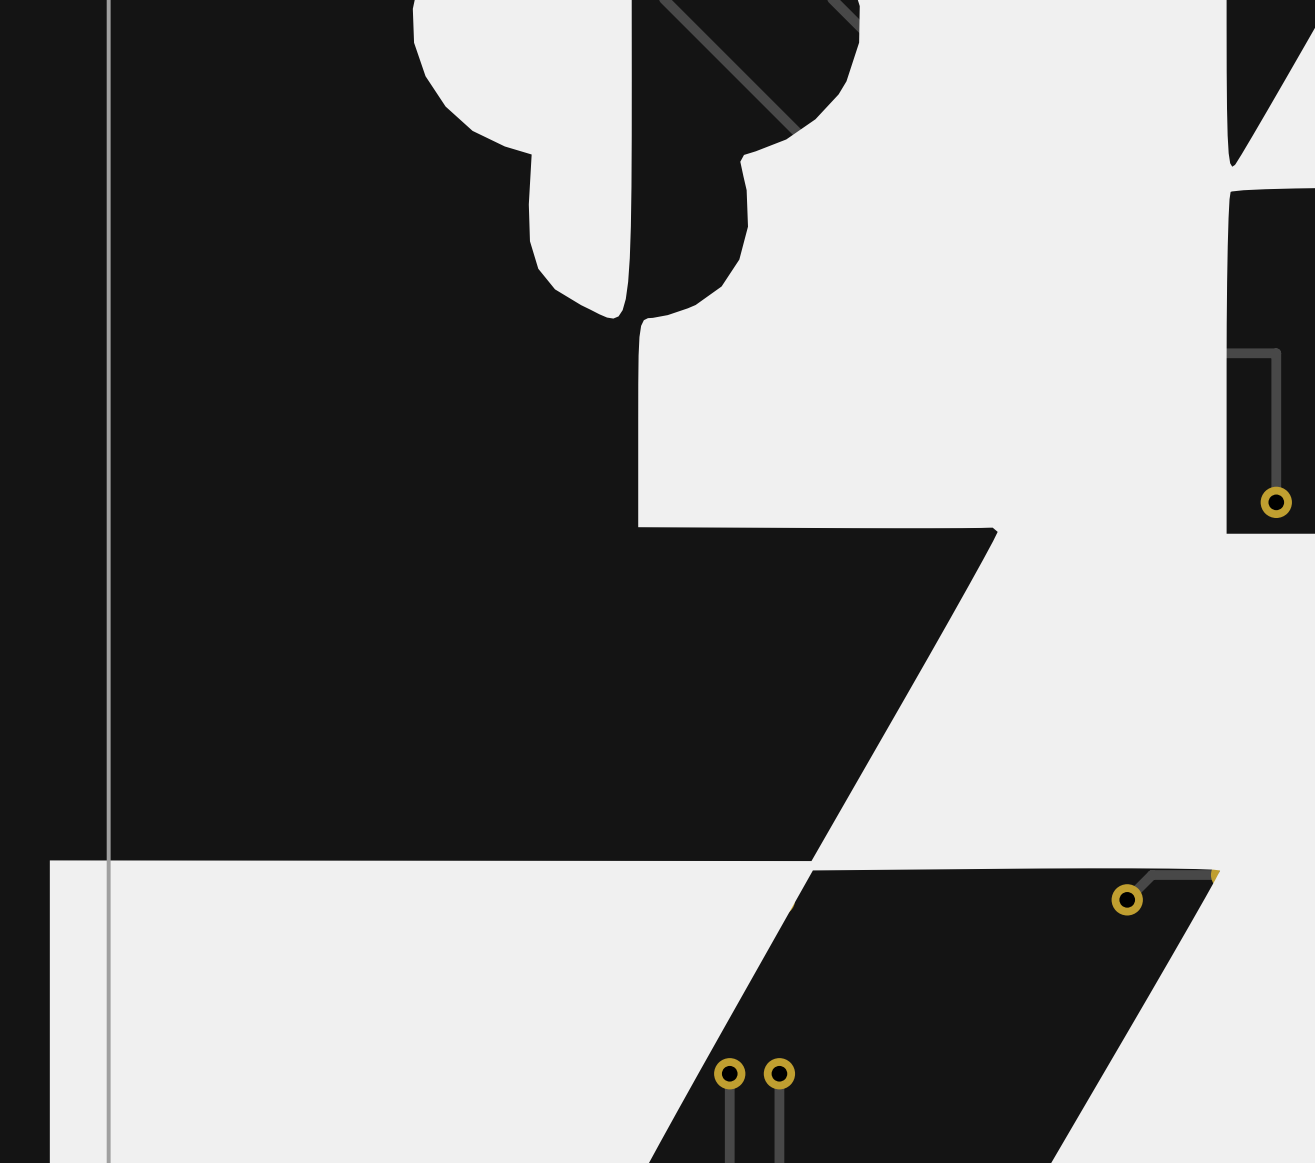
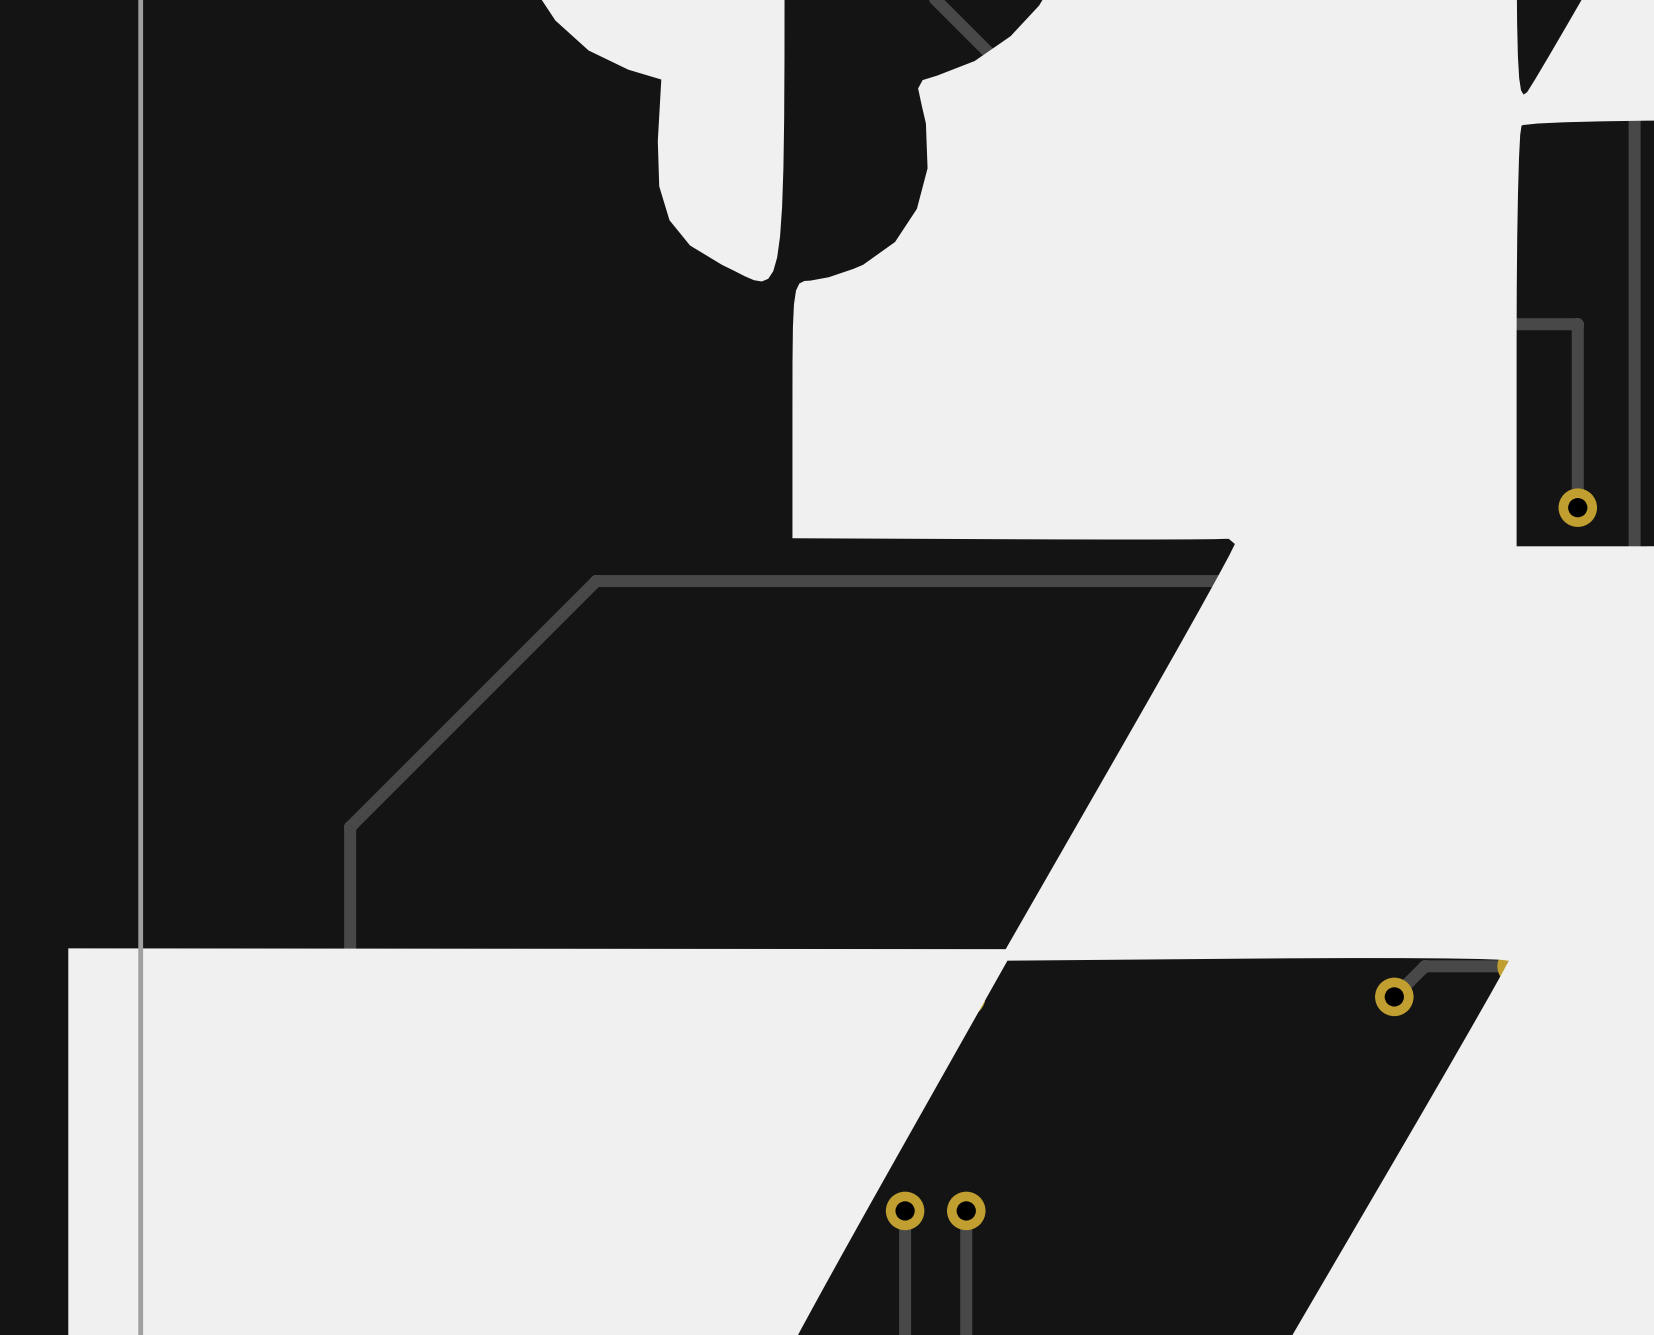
track: none -> (1333, 581) (596, 581) (350, 827) (350, 1062) (293, 1119)

